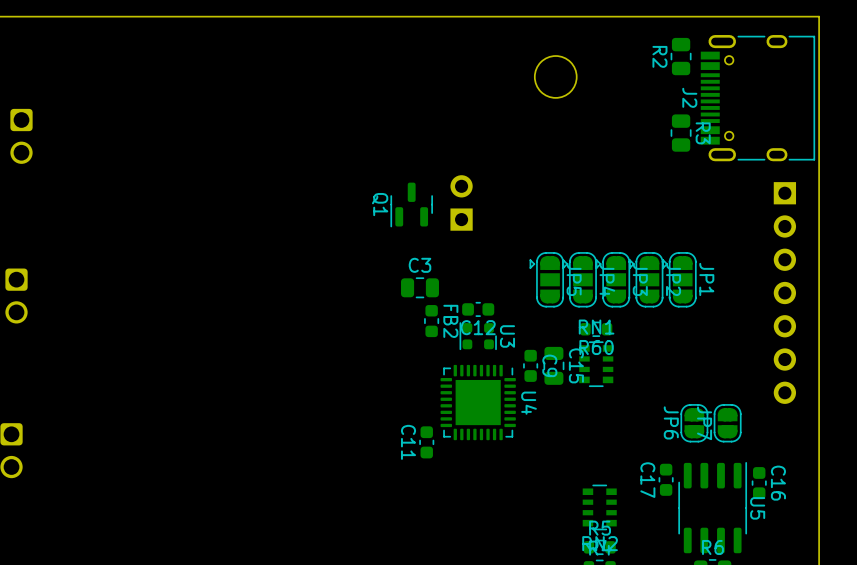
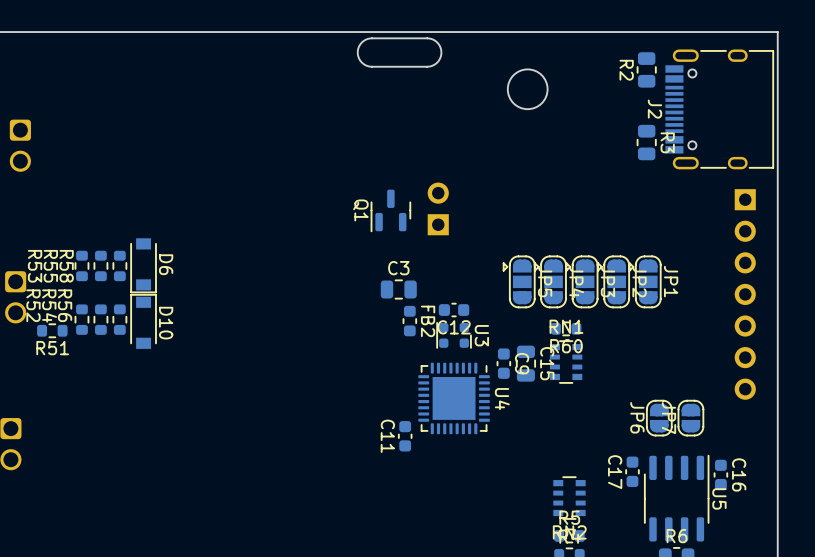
board edge: none -> (427, 38) (368, 38) (359, 45) (358, 56) (363, 63) (370, 66) (430, 66) (439, 59) (441, 50) (435, 41) (427, 38)
D6: none -> (143, 265)
R53: none -> (81, 265)
R55: none -> (100, 265)
R58: none -> (119, 265)
R52: none -> (81, 319)
R54: none -> (100, 319)
R56: none -> (119, 319)
D10: none -> (143, 321)
R51: none -> (52, 330)

